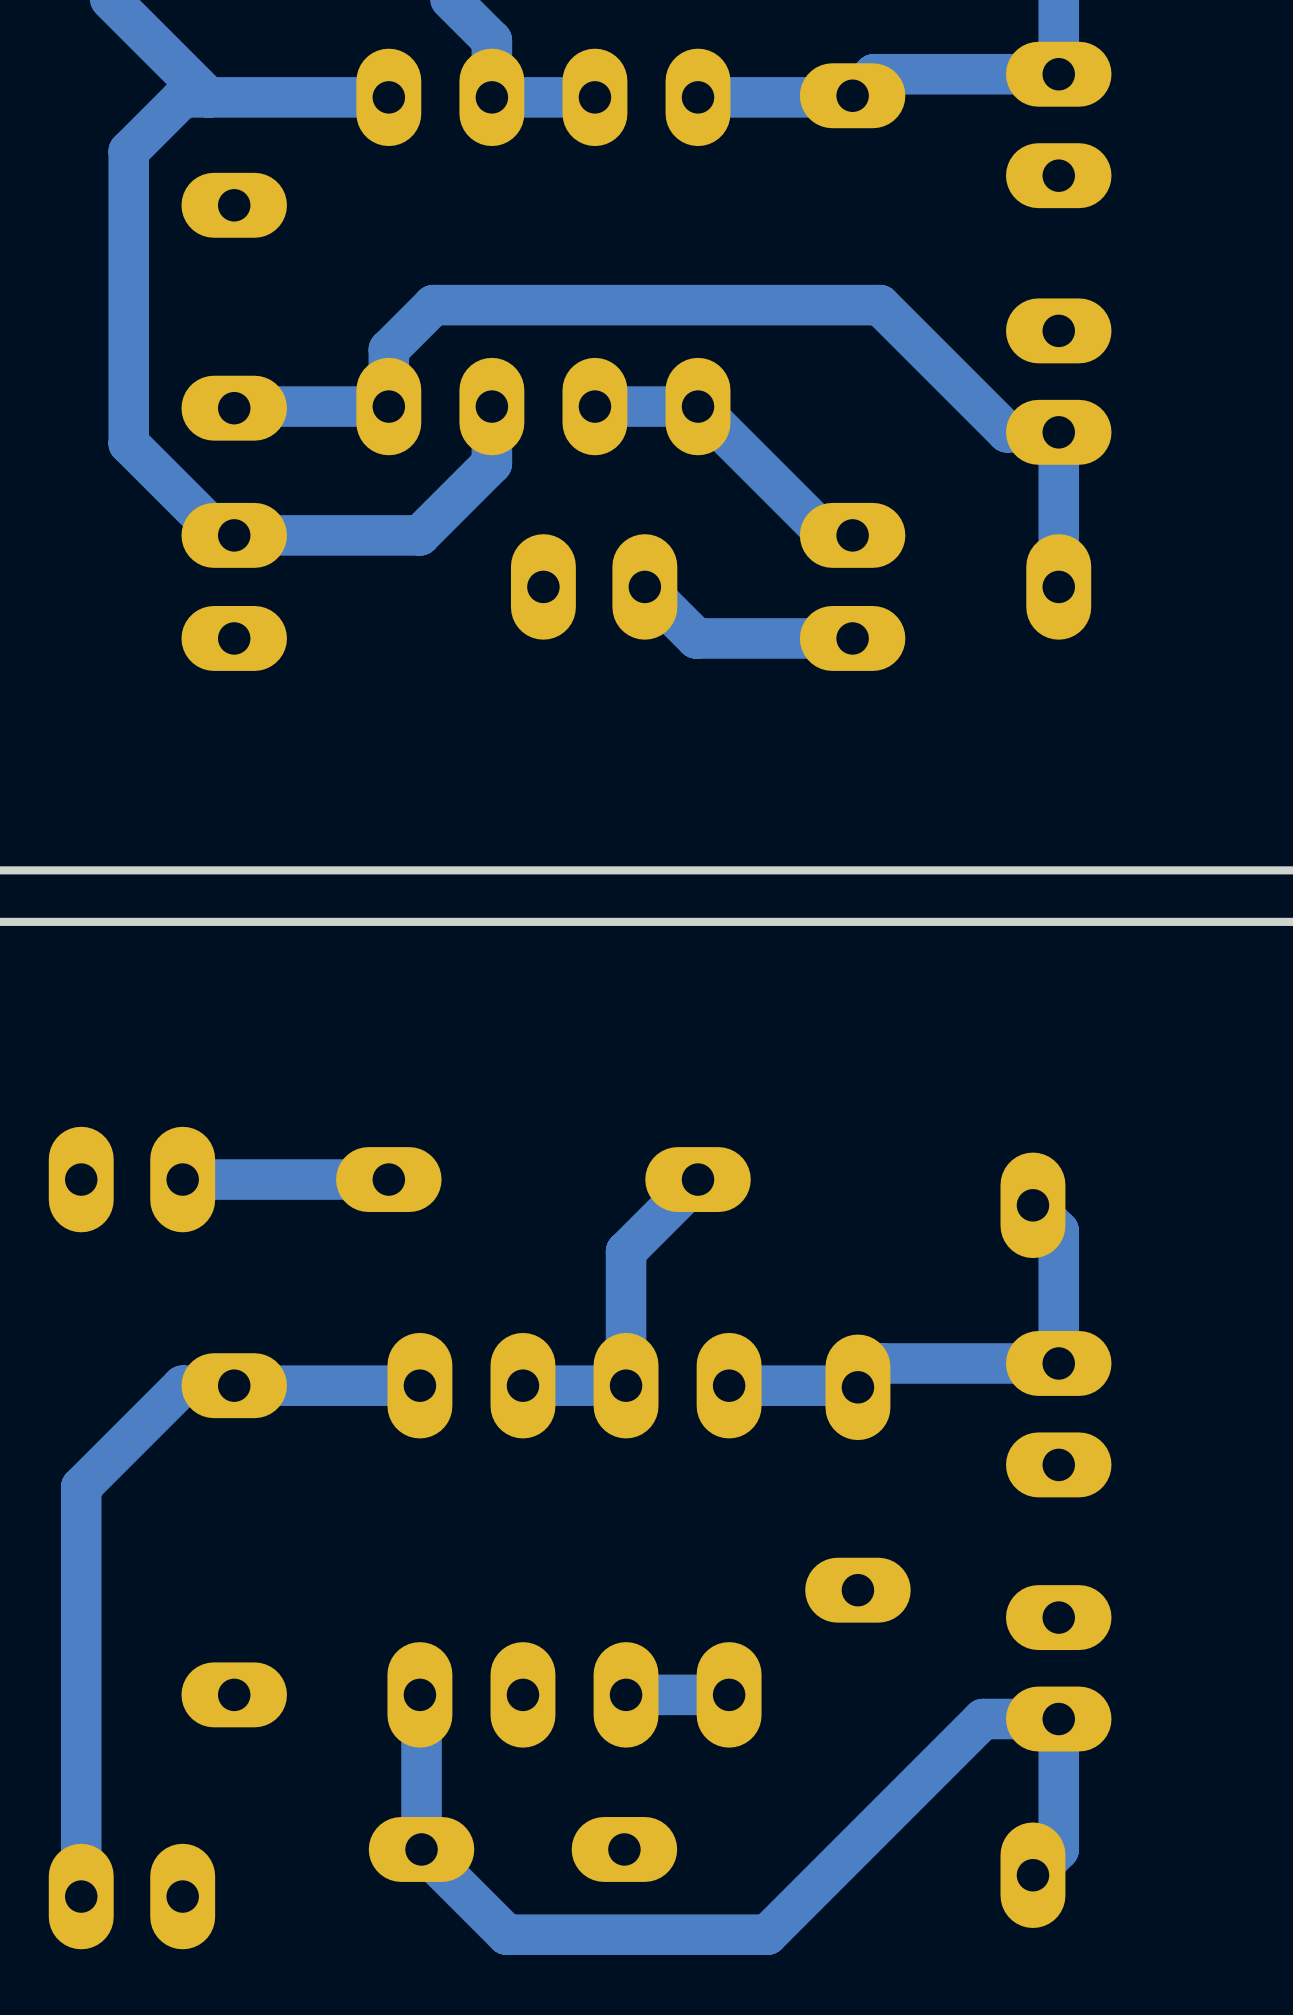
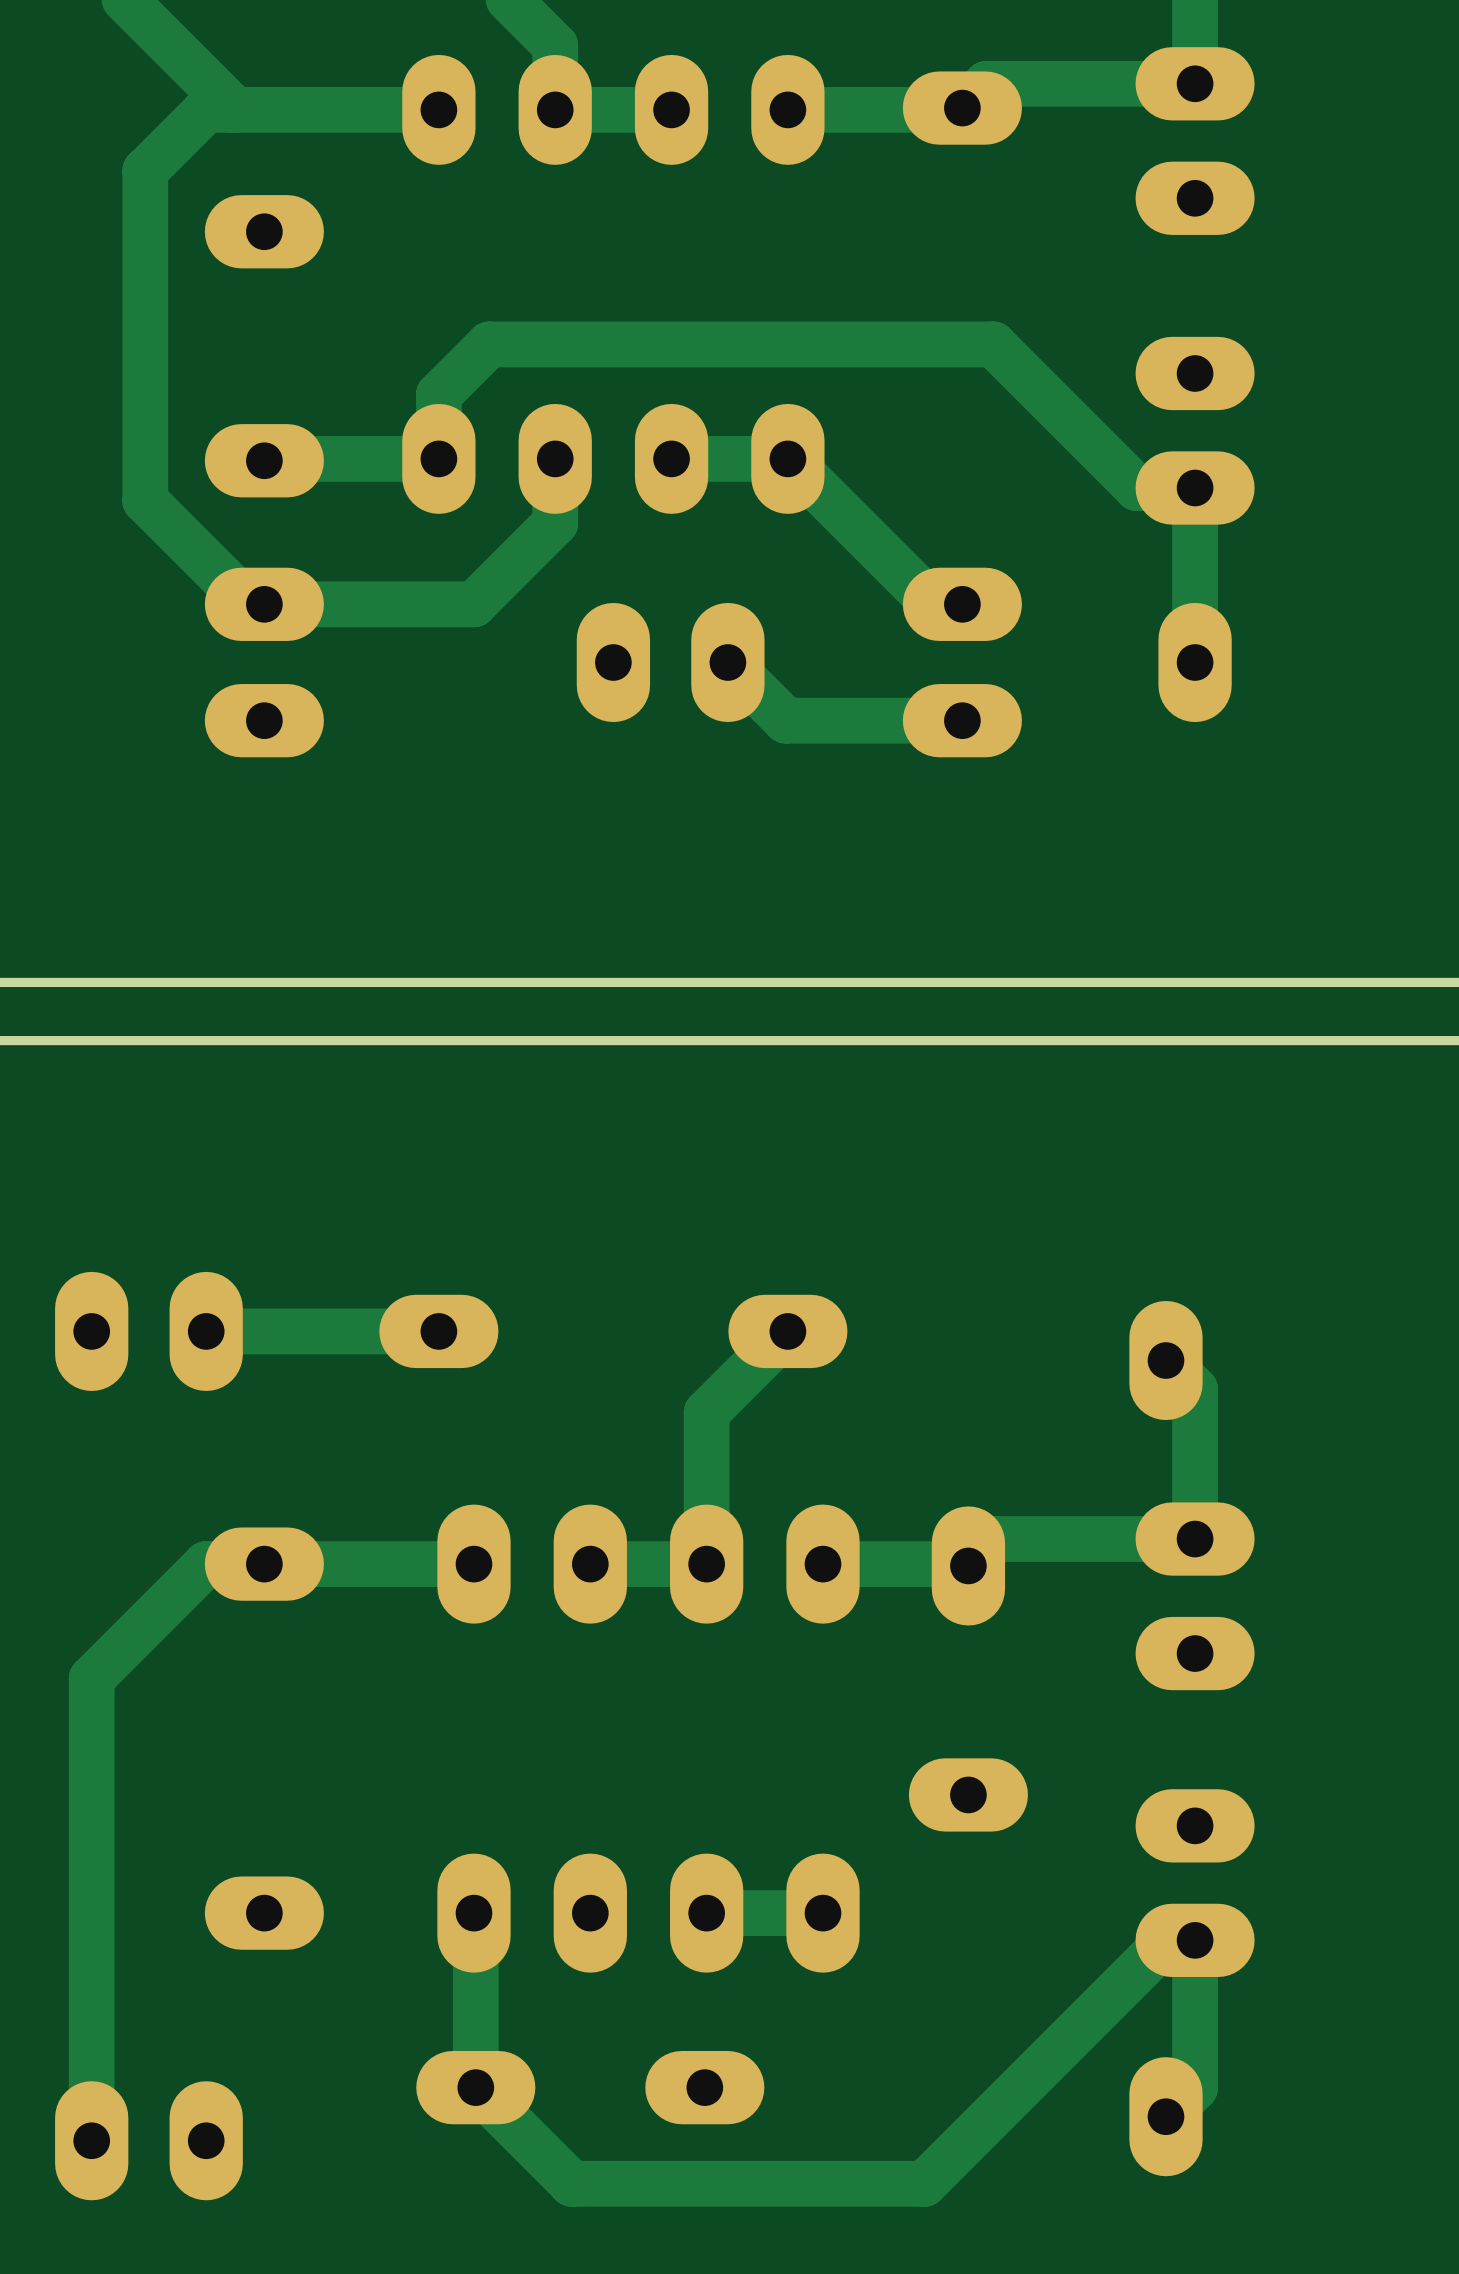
track: (1034, 1719) (983, 1719) (767, 1934) -> (1167, 1940) (924, 2183) (866, 2183)

